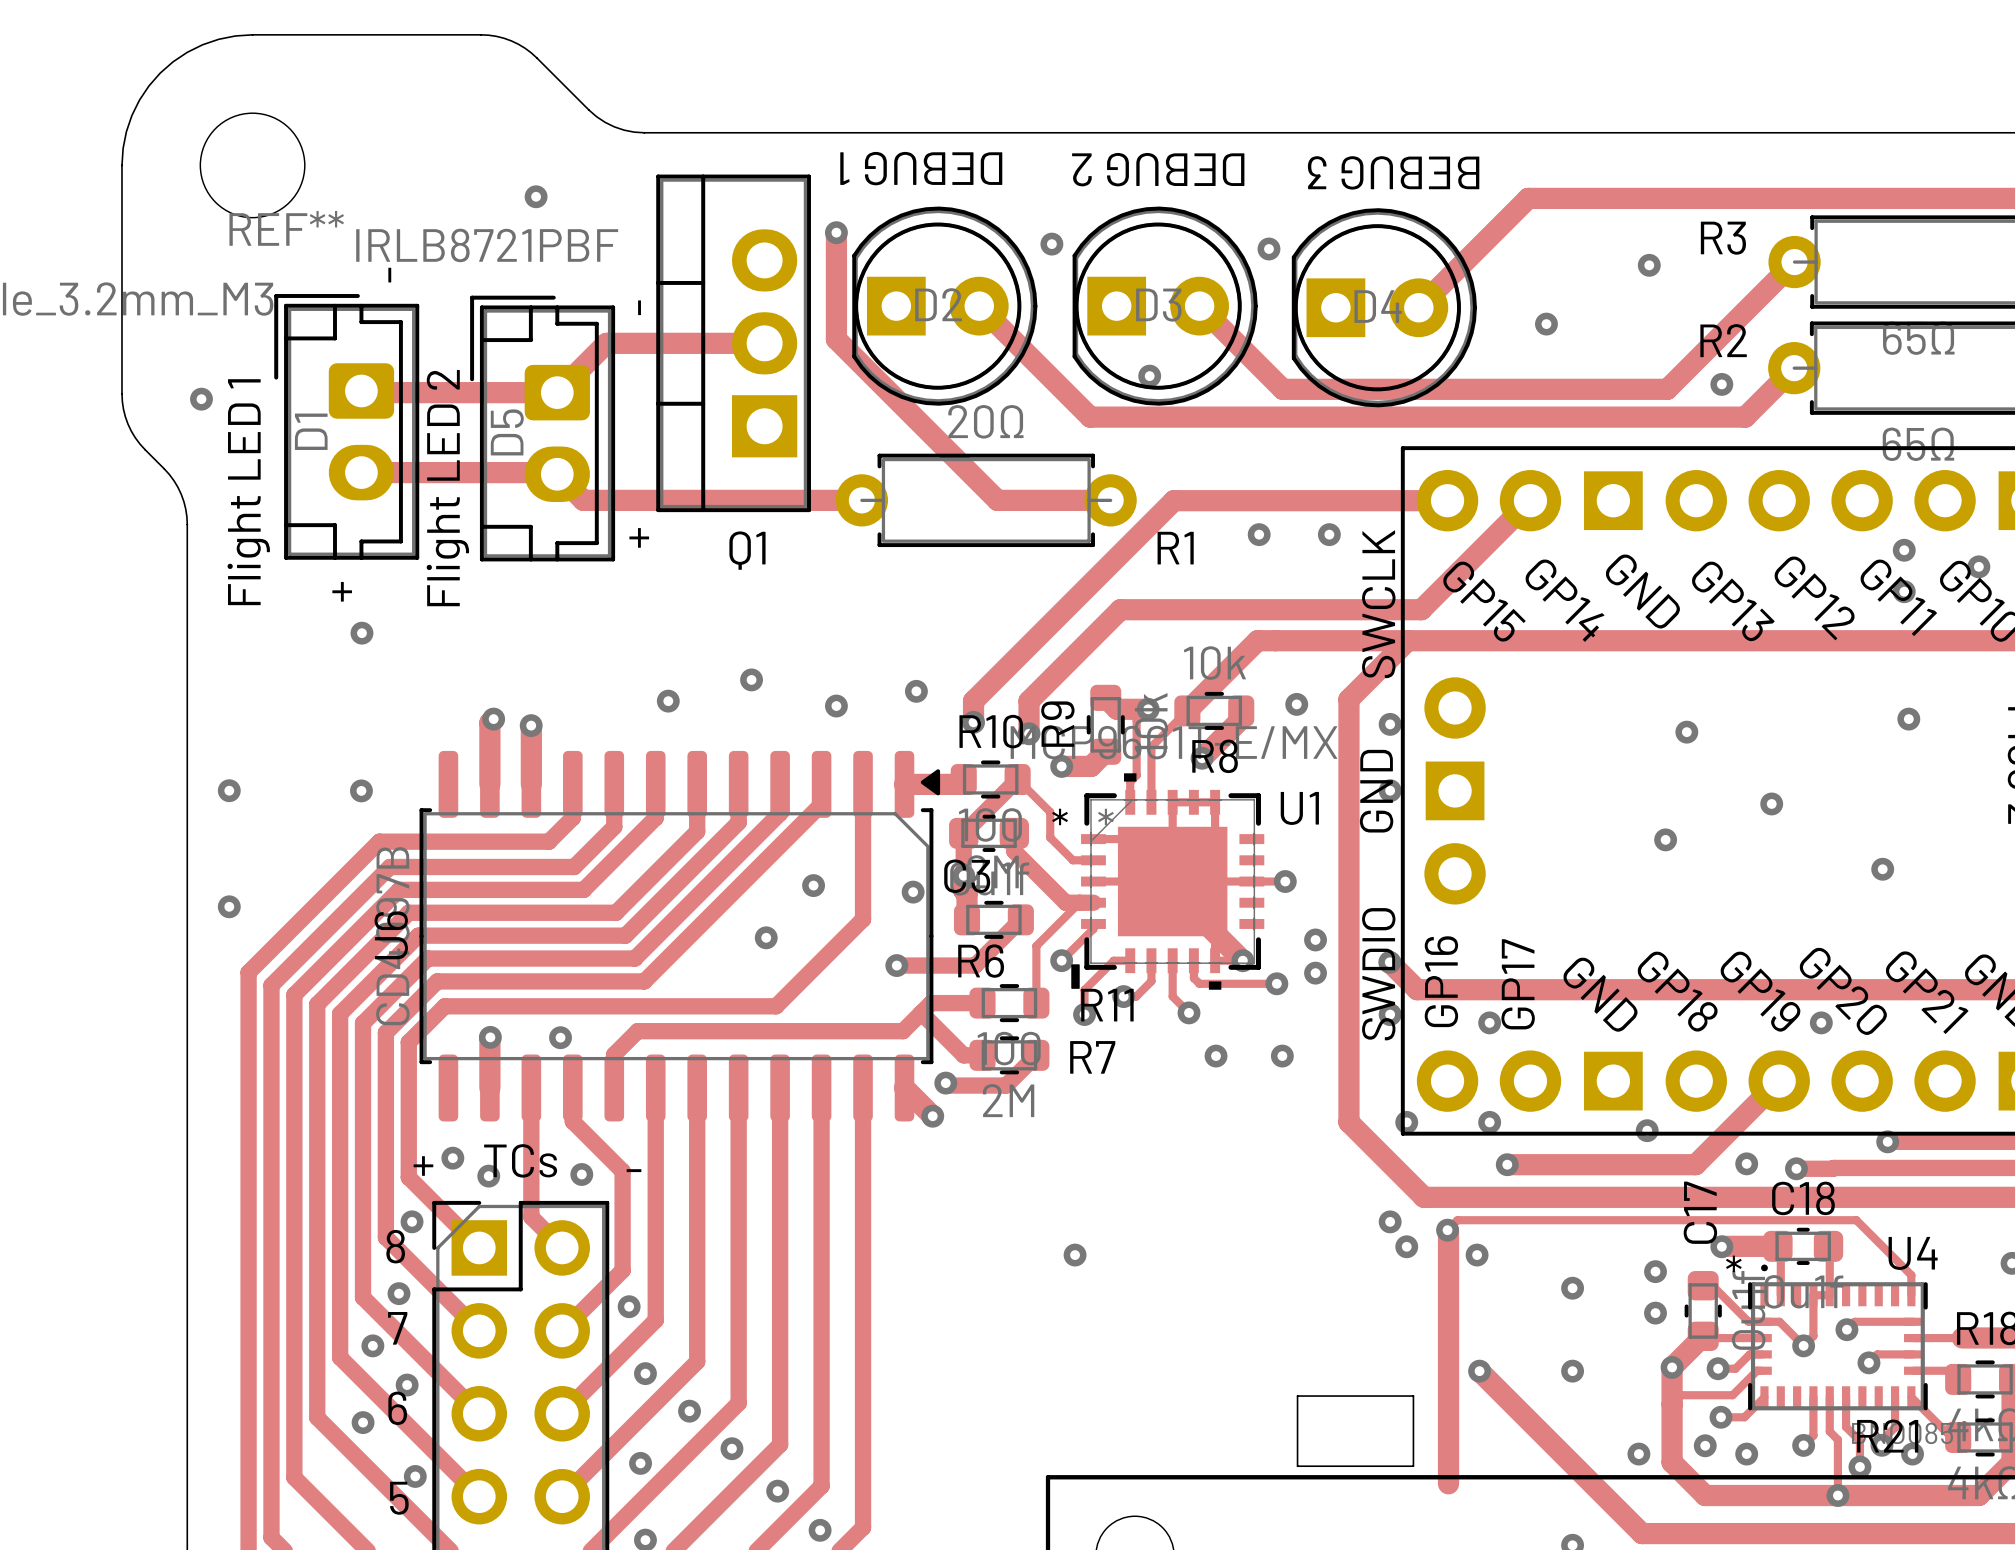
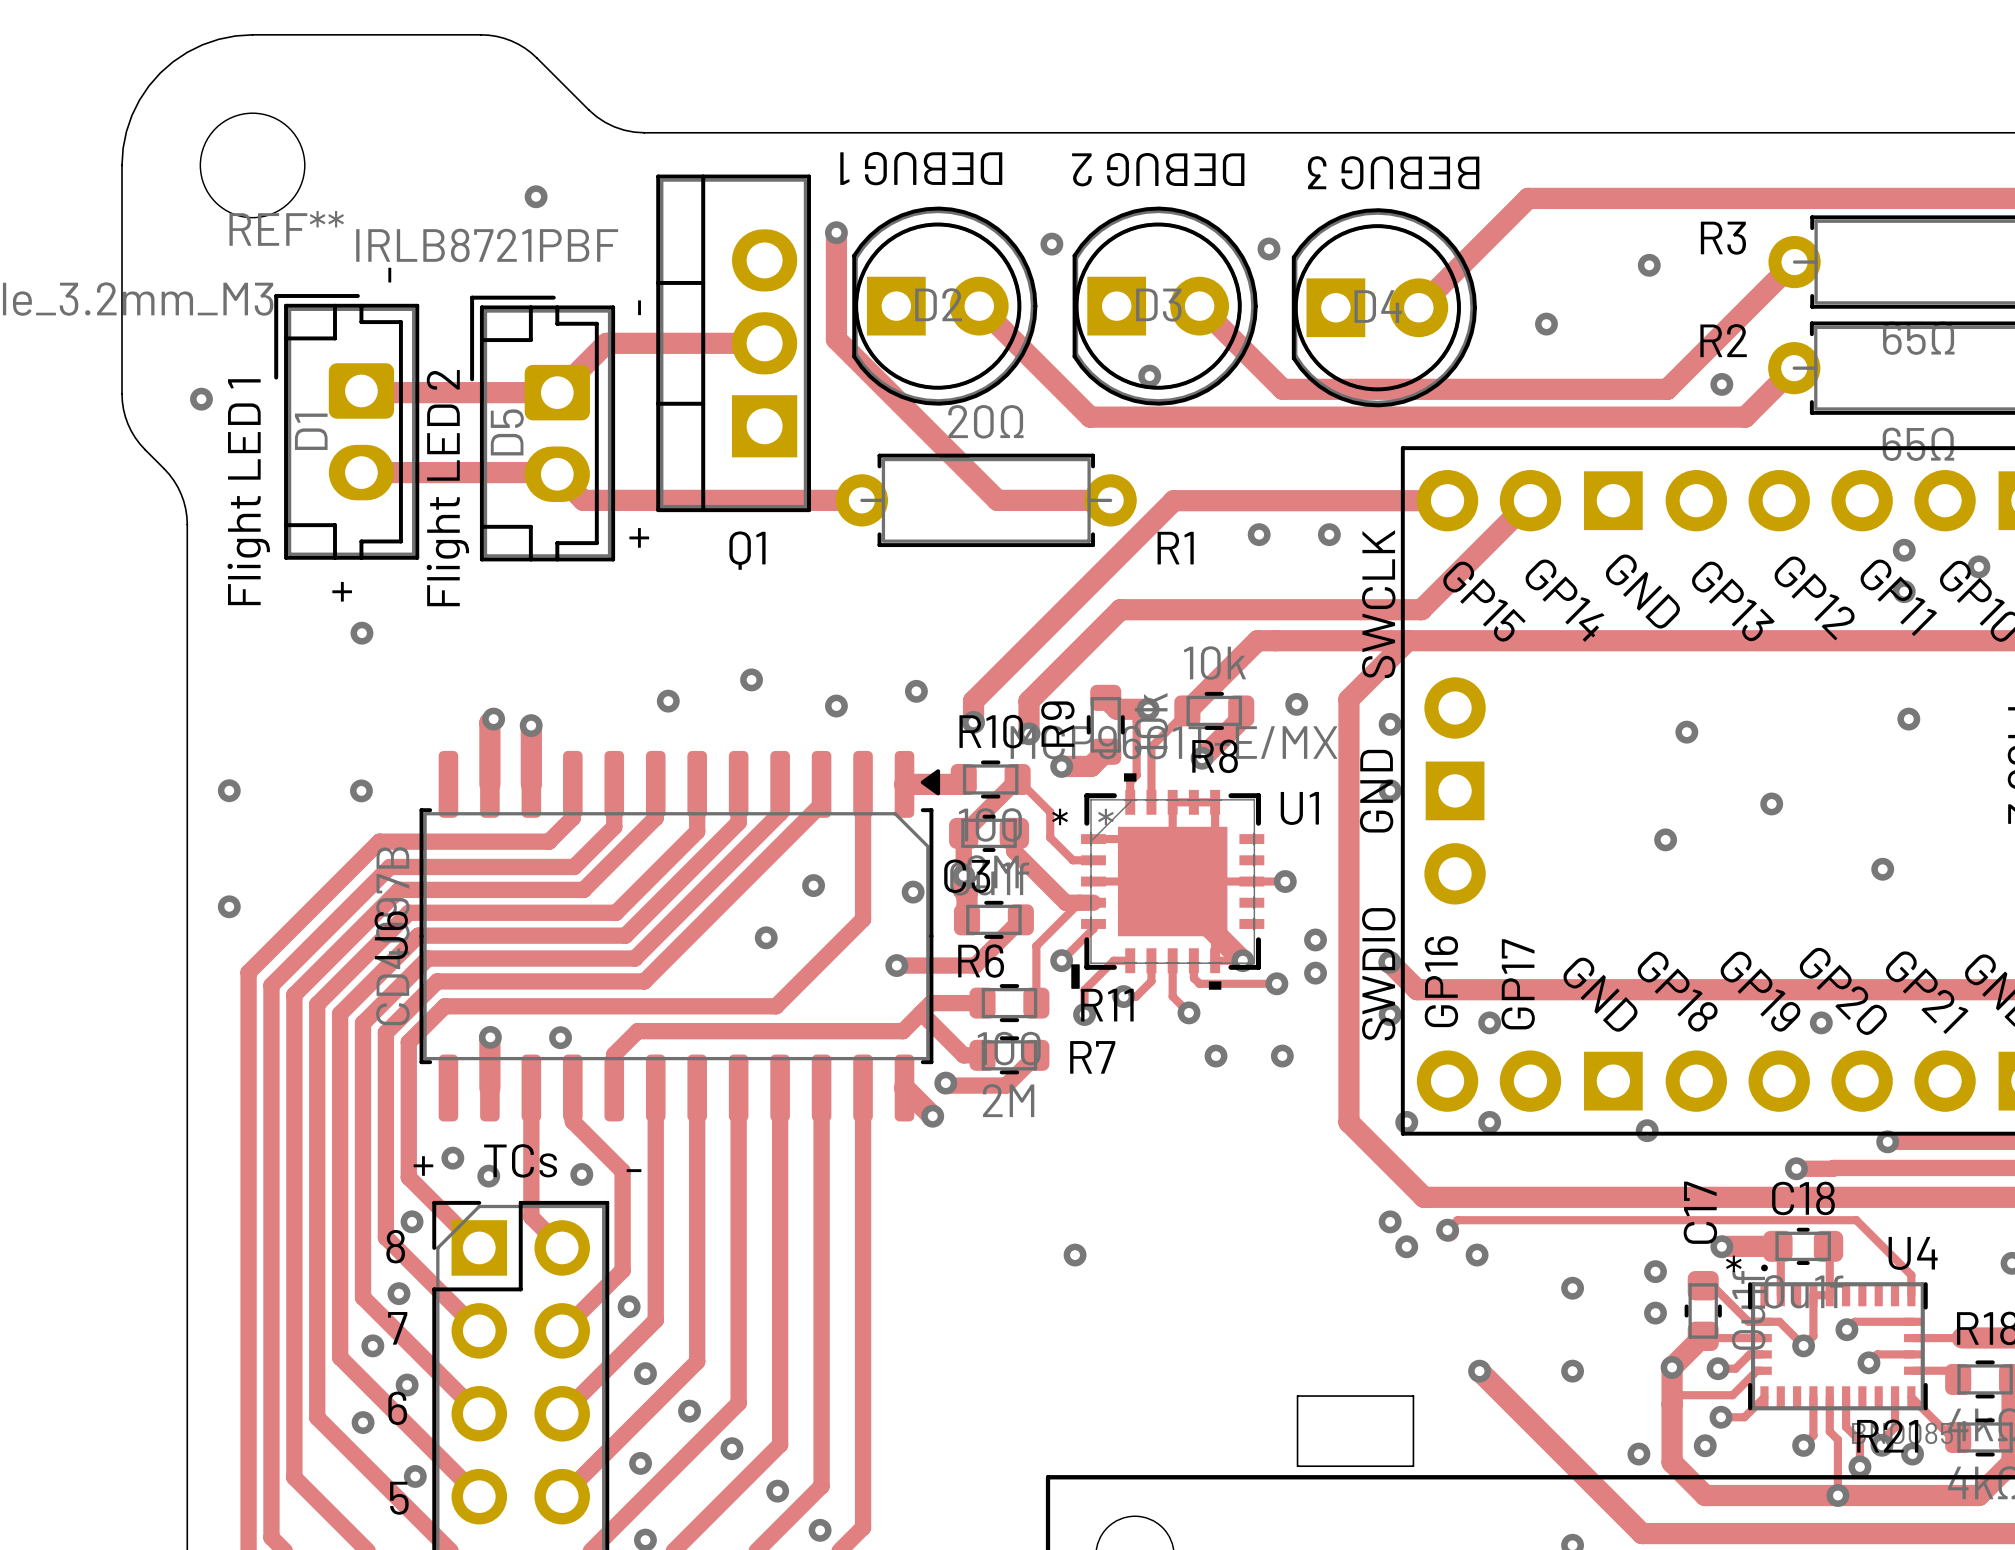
track: (1779, 1081) (1695, 1164) (1507, 1164) -> none
via: (1746, 1163) -> none
via: (1507, 1164) -> none
track: (1448, 1231) (1448, 1483) -> none
via: (1746, 1454) -> none

